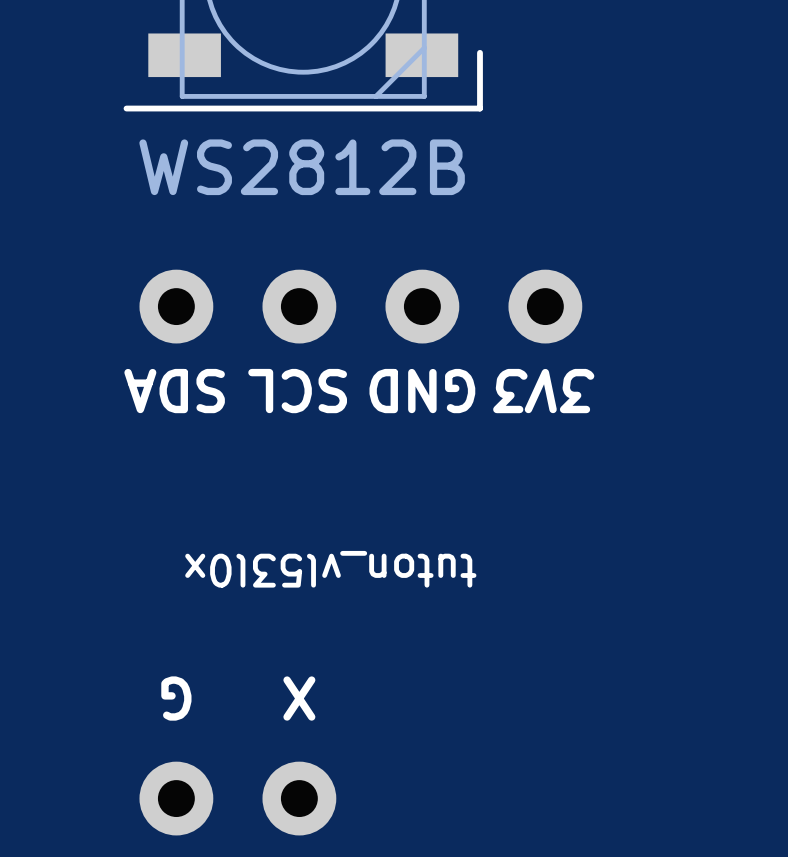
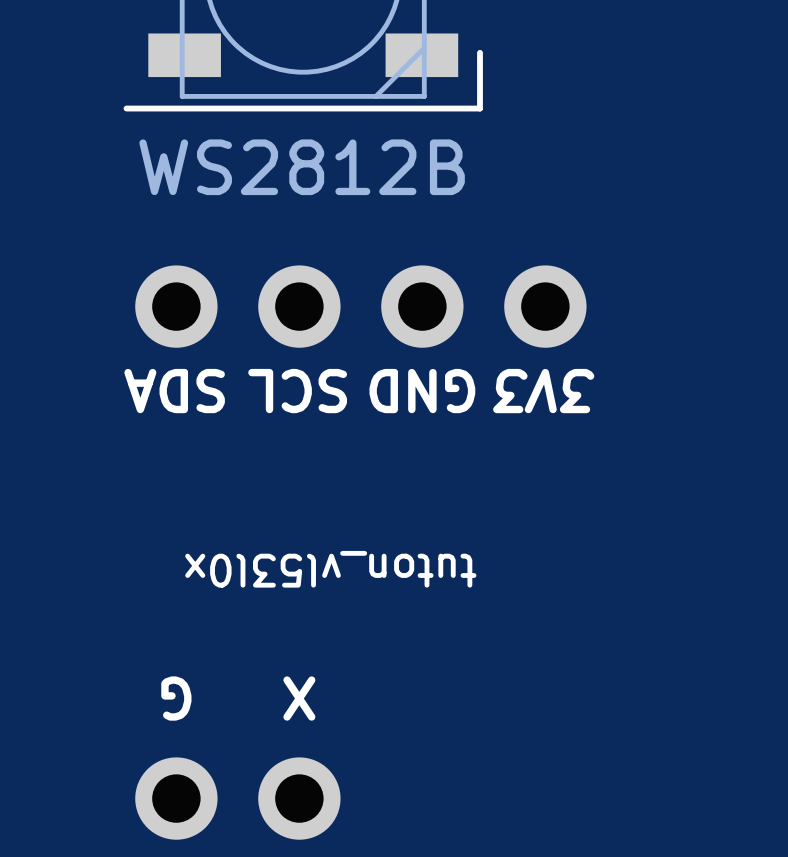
part footprint: [139, 269, 583, 836] -> [135, 265, 587, 840]

